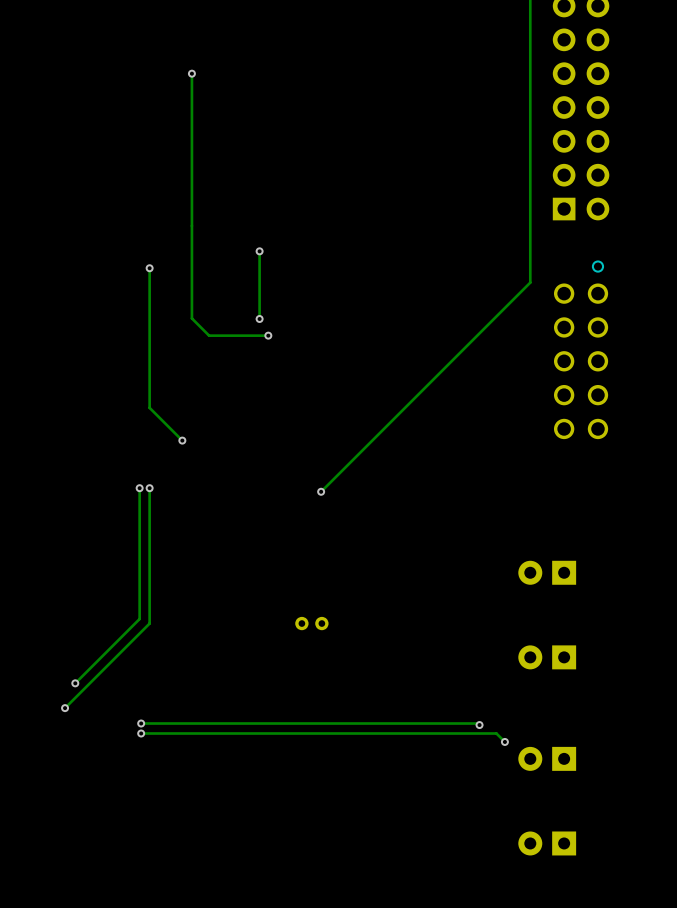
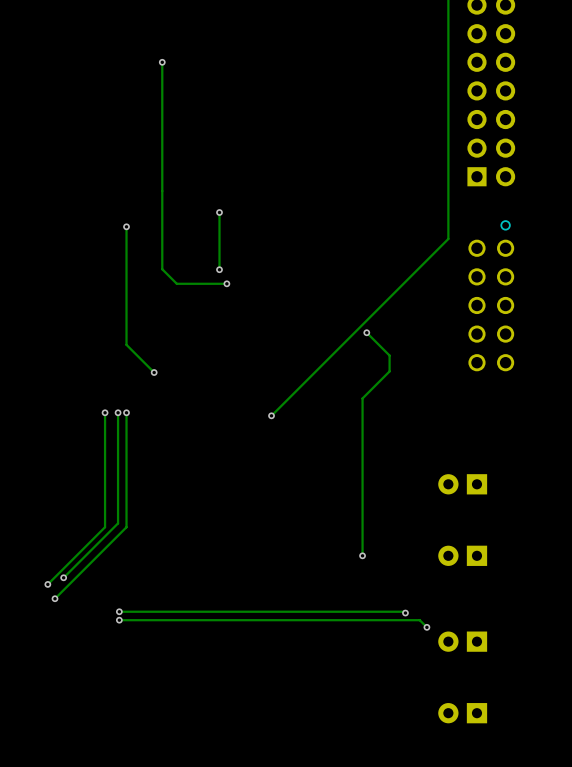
track: none -> (366, 332) (389, 355) (389, 371) (362, 398) (362, 555)
via: none -> (366, 332)
track: none -> (105, 412) (105, 527) (47, 584)
via: none -> (105, 412)
part: (311, 623) -> none
via: none -> (362, 555)
via: none -> (47, 584)

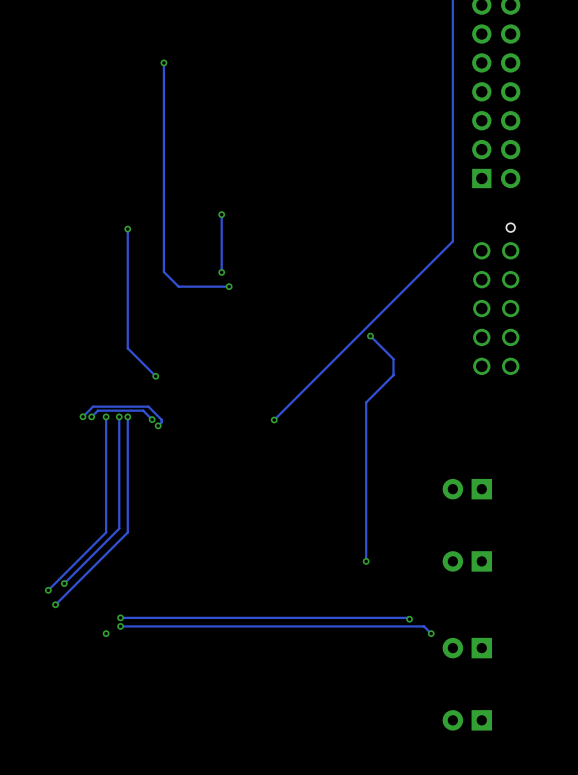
track: none -> (82, 416) (93, 406) (148, 406) (161, 419) (158, 425)
via: none -> (82, 416)
track: none -> (91, 416) (97, 410) (143, 410) (152, 419)
via: none -> (91, 416)
via: none -> (152, 419)
via: none -> (158, 425)
via: none -> (106, 633)

